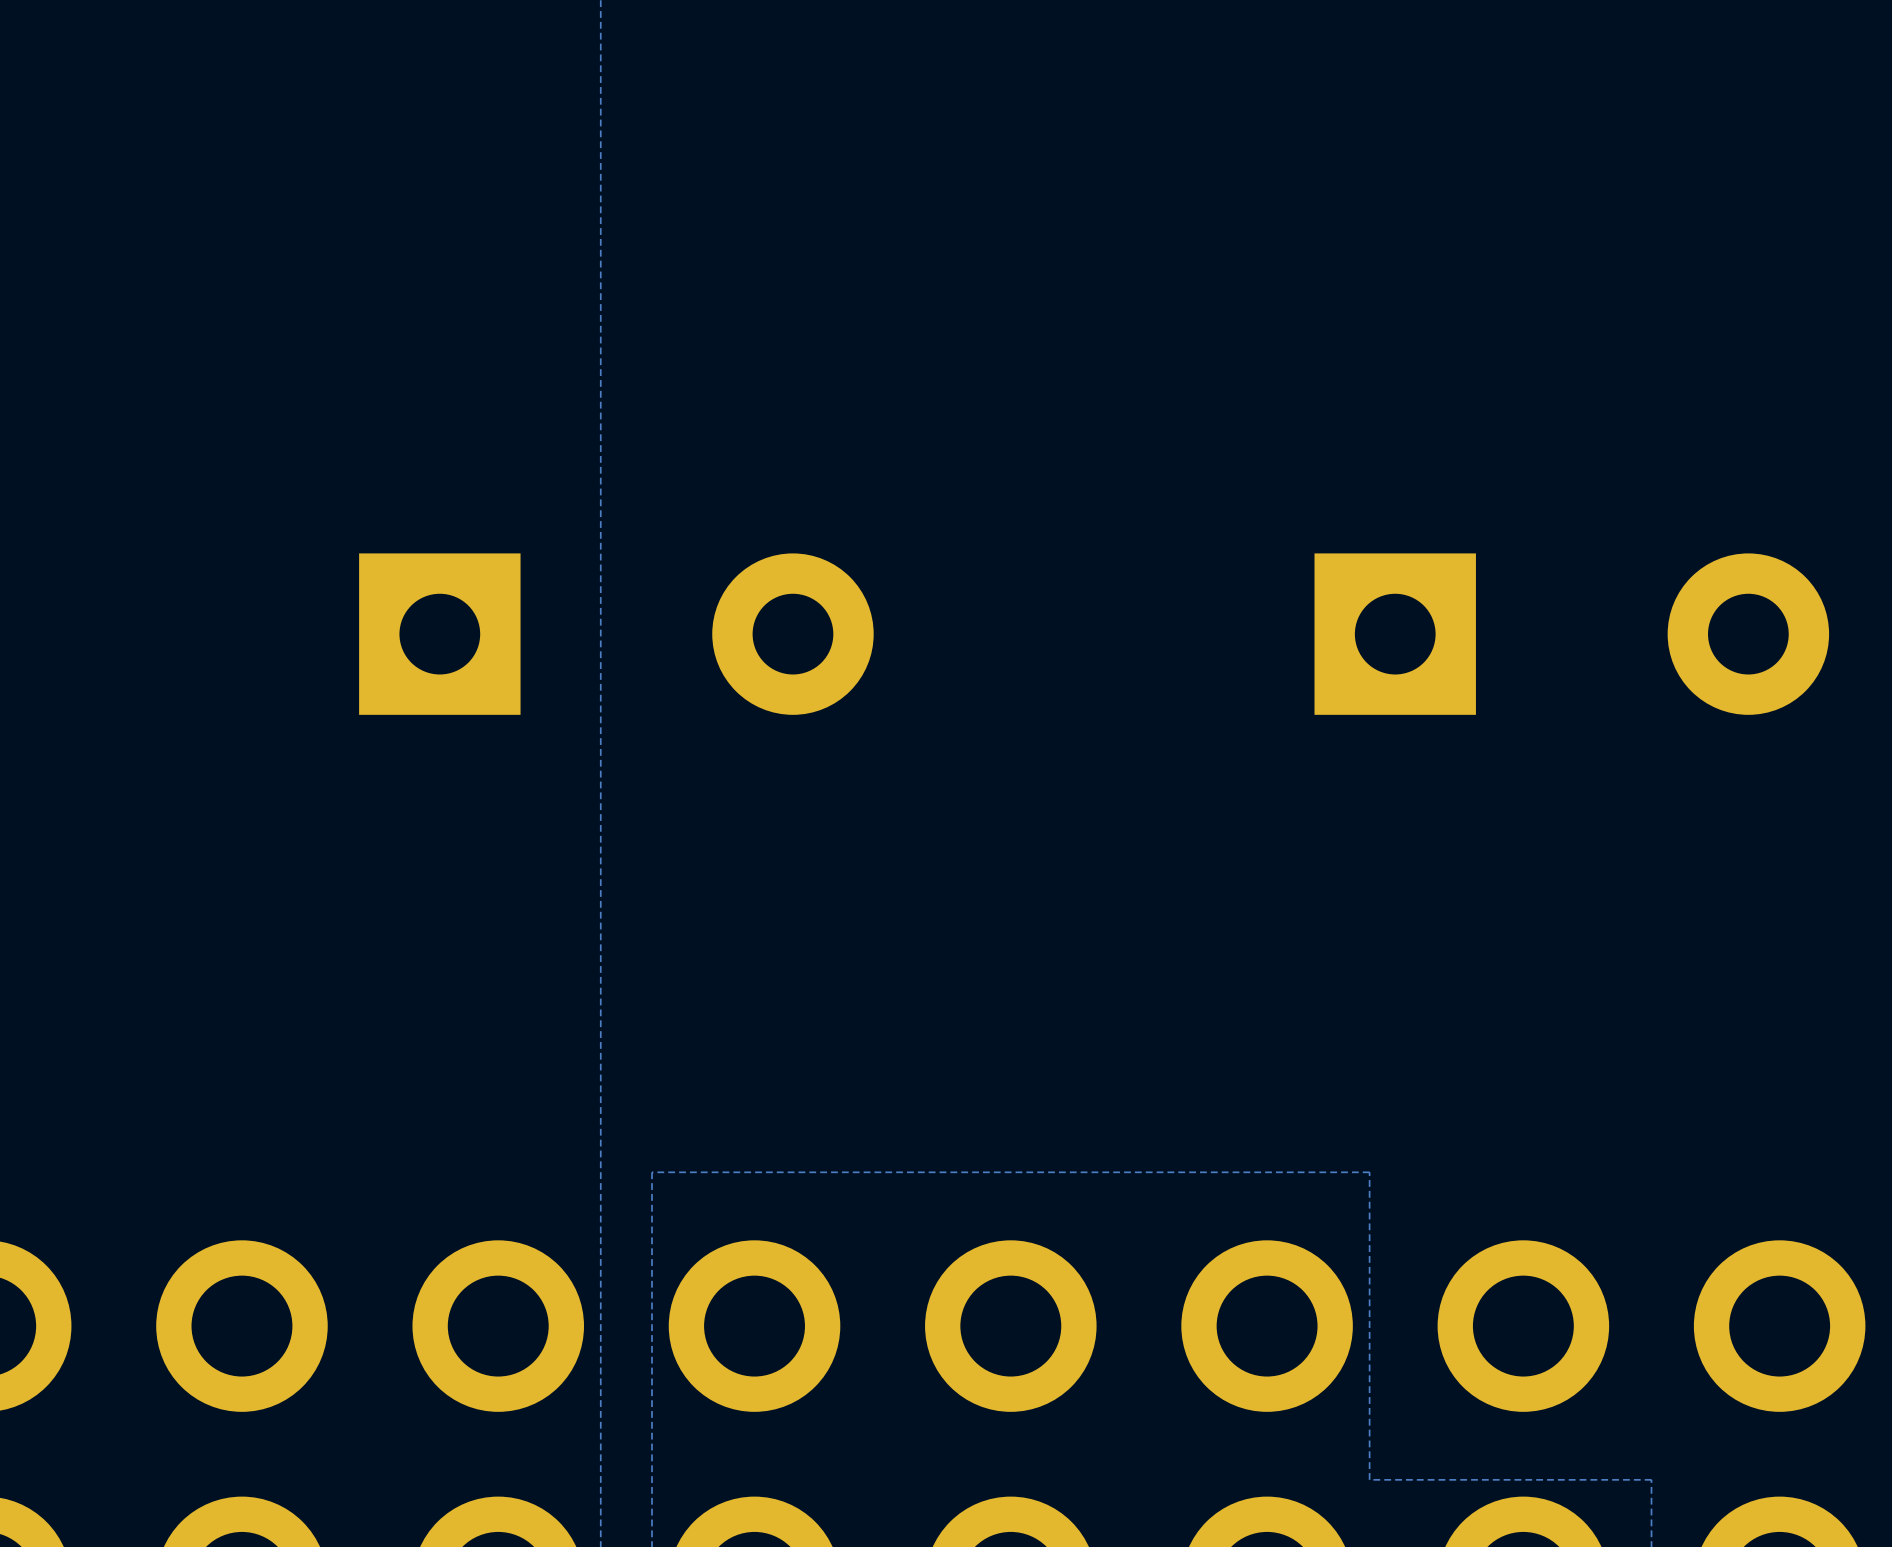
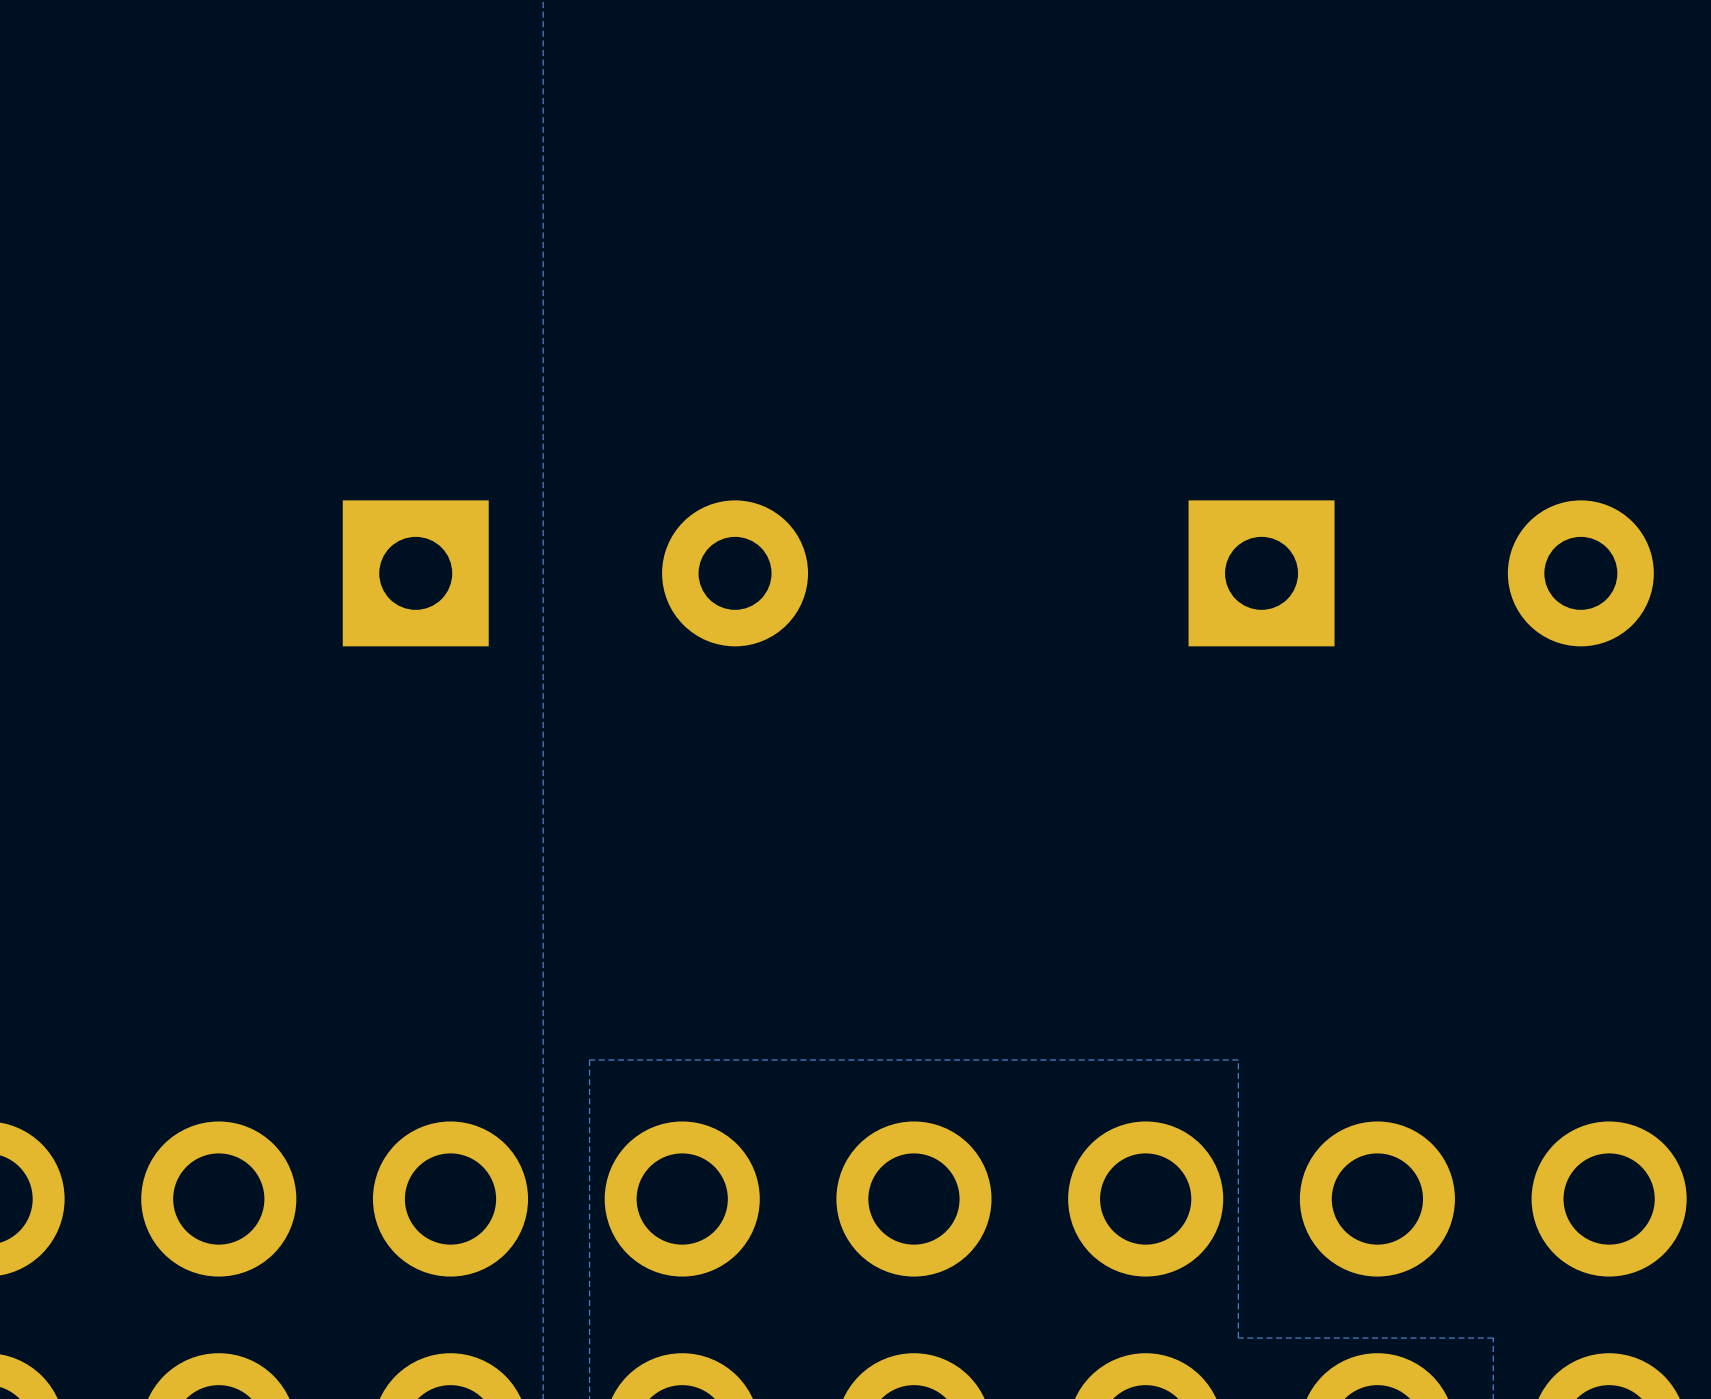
part position: (616, 634) -> (575, 573)

